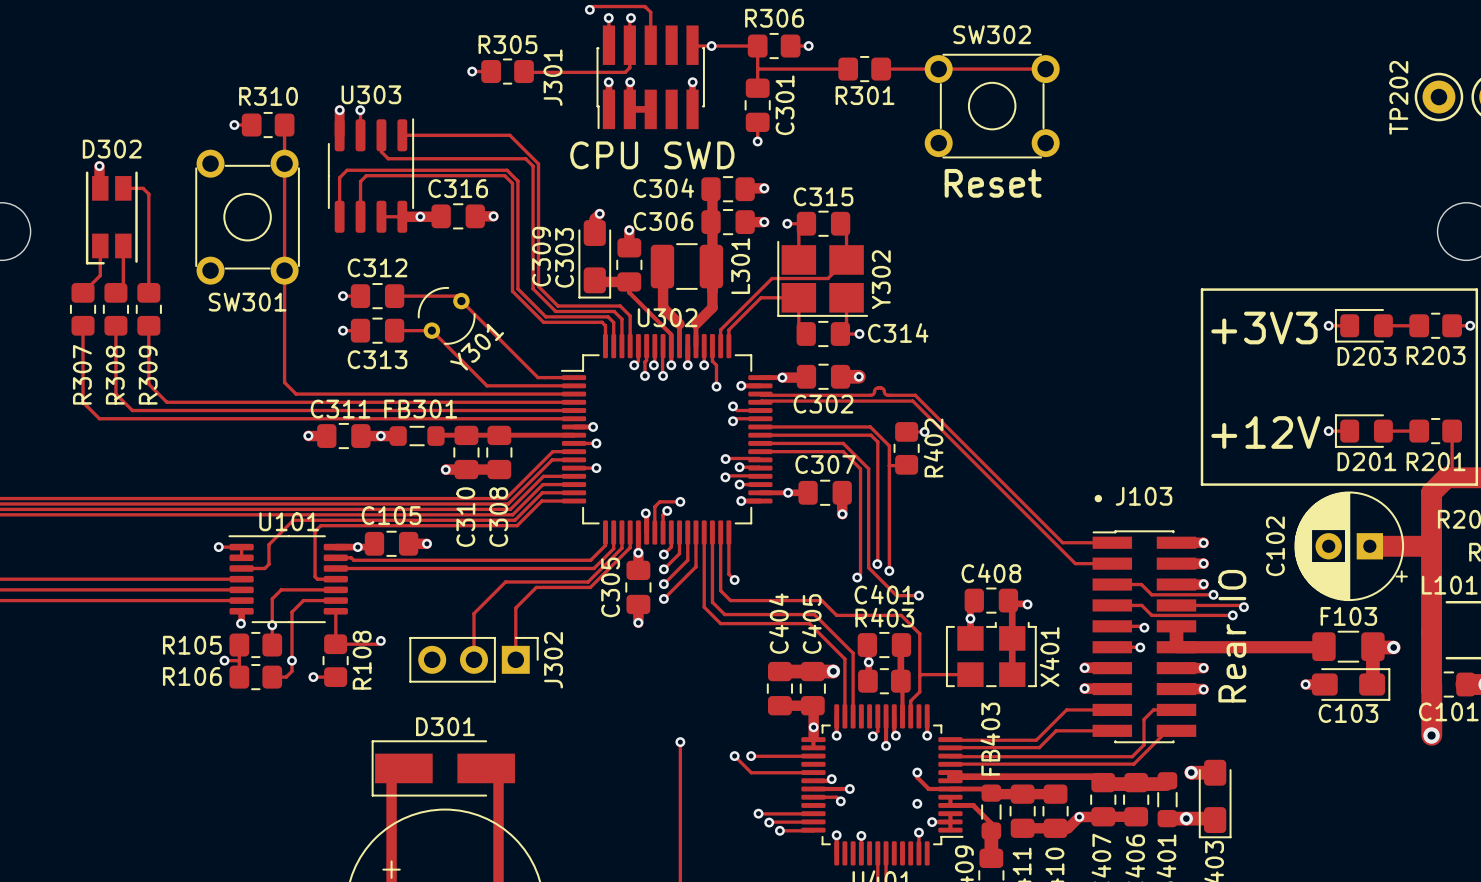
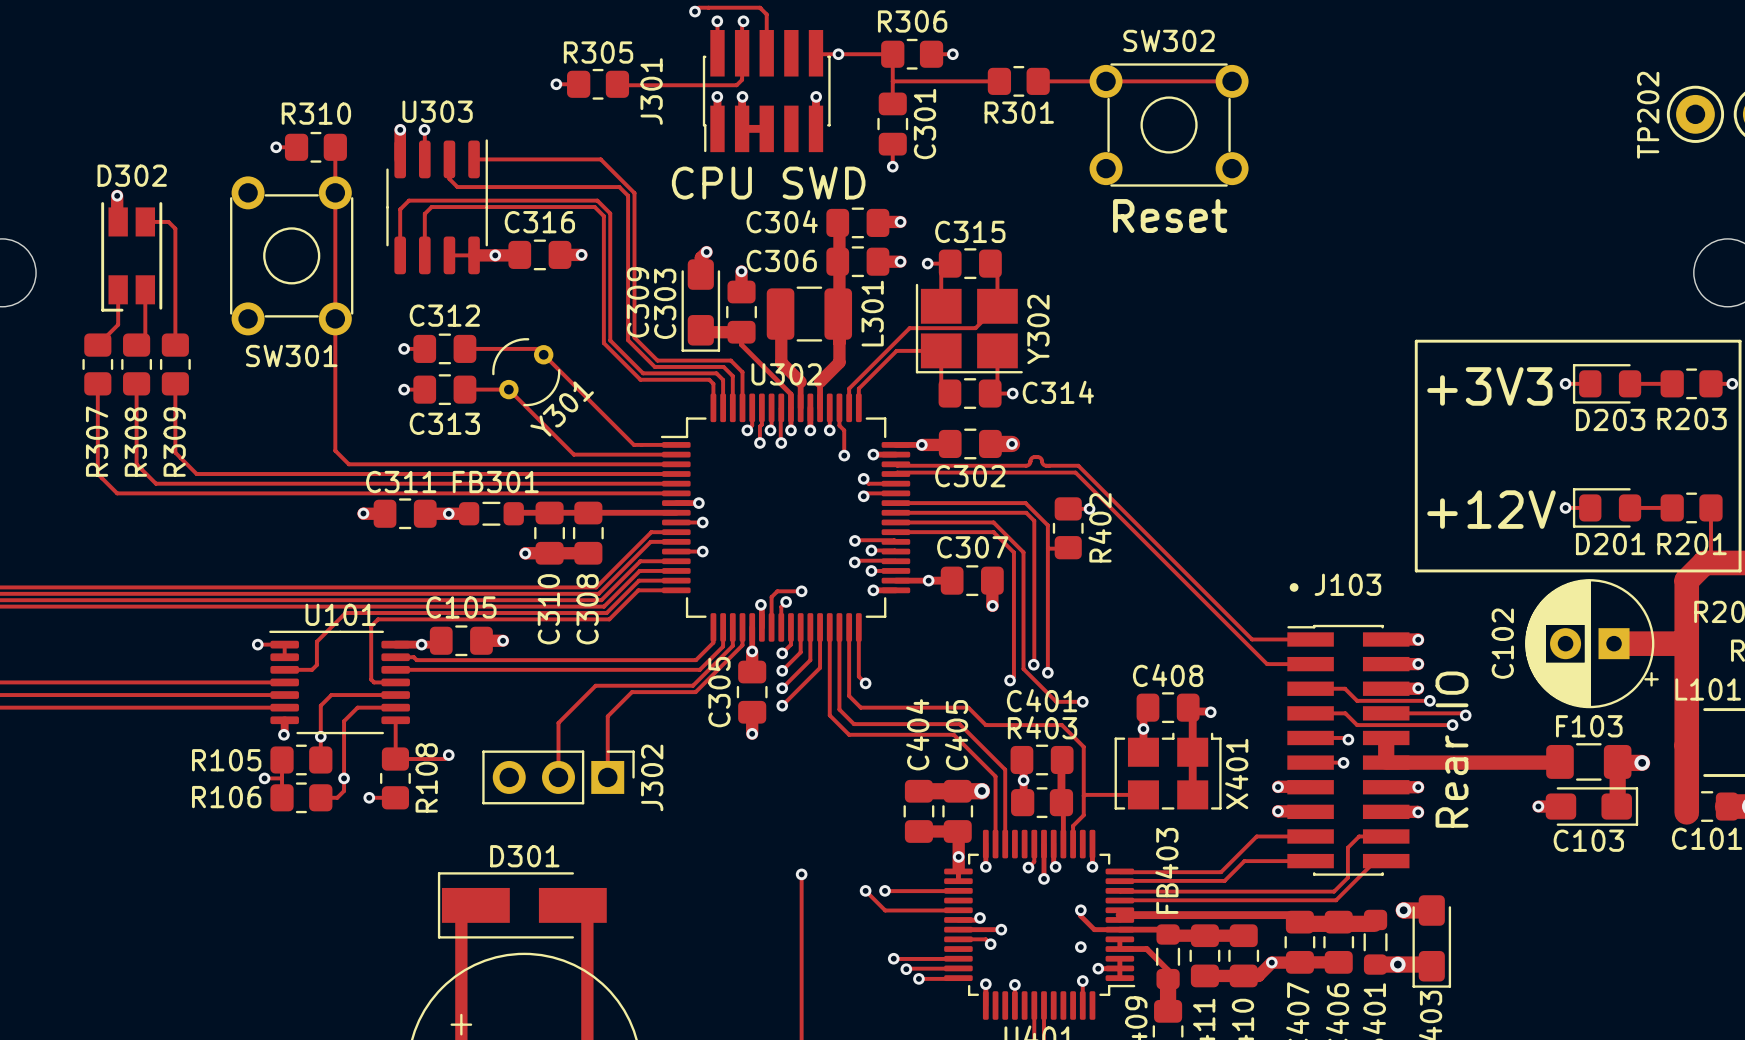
track: (1431, 684) (1431, 735) -> none
via: (1431, 735) -> none

